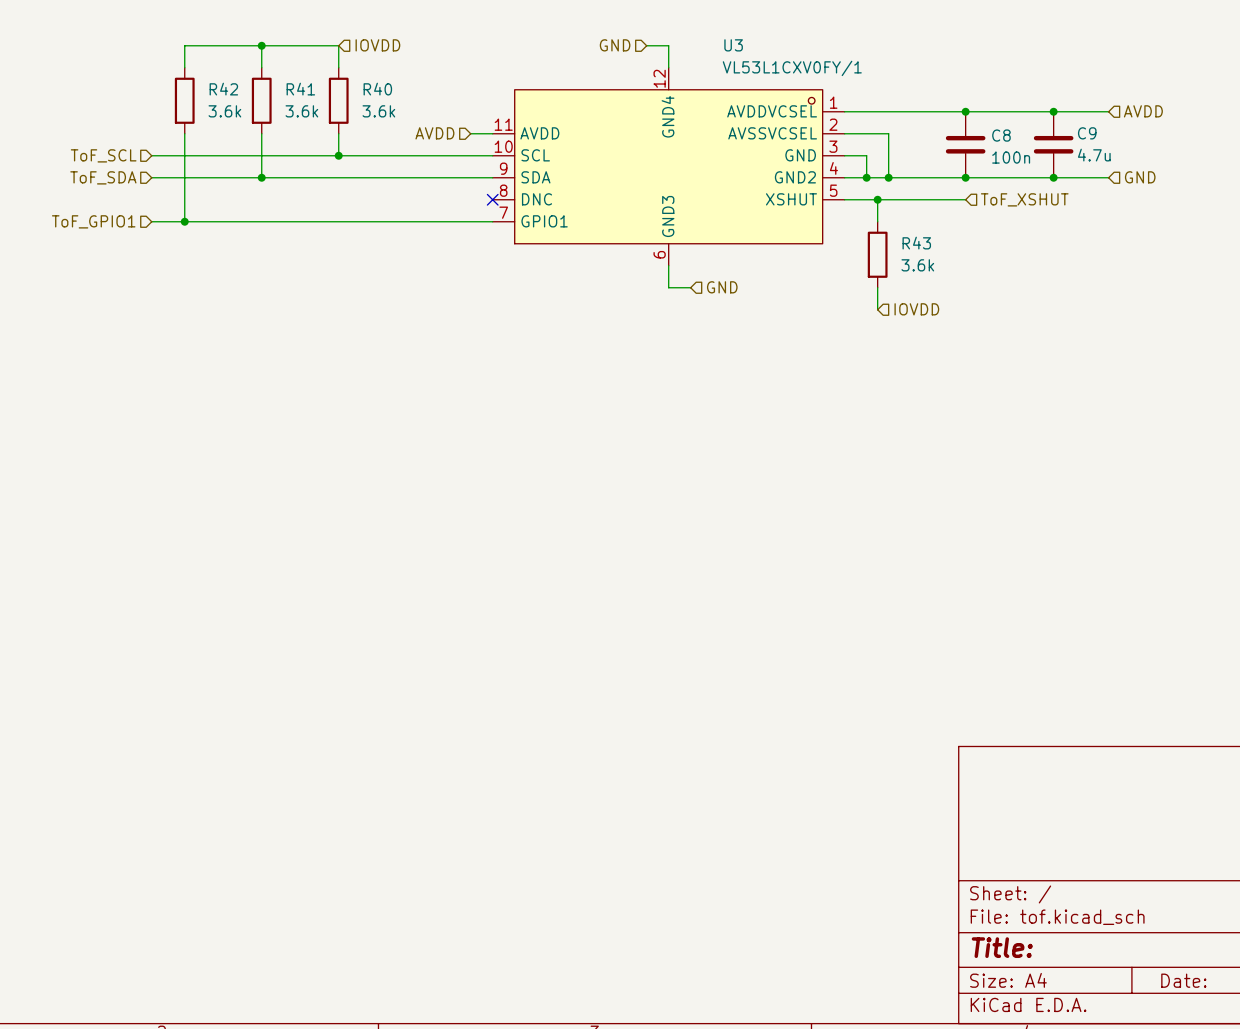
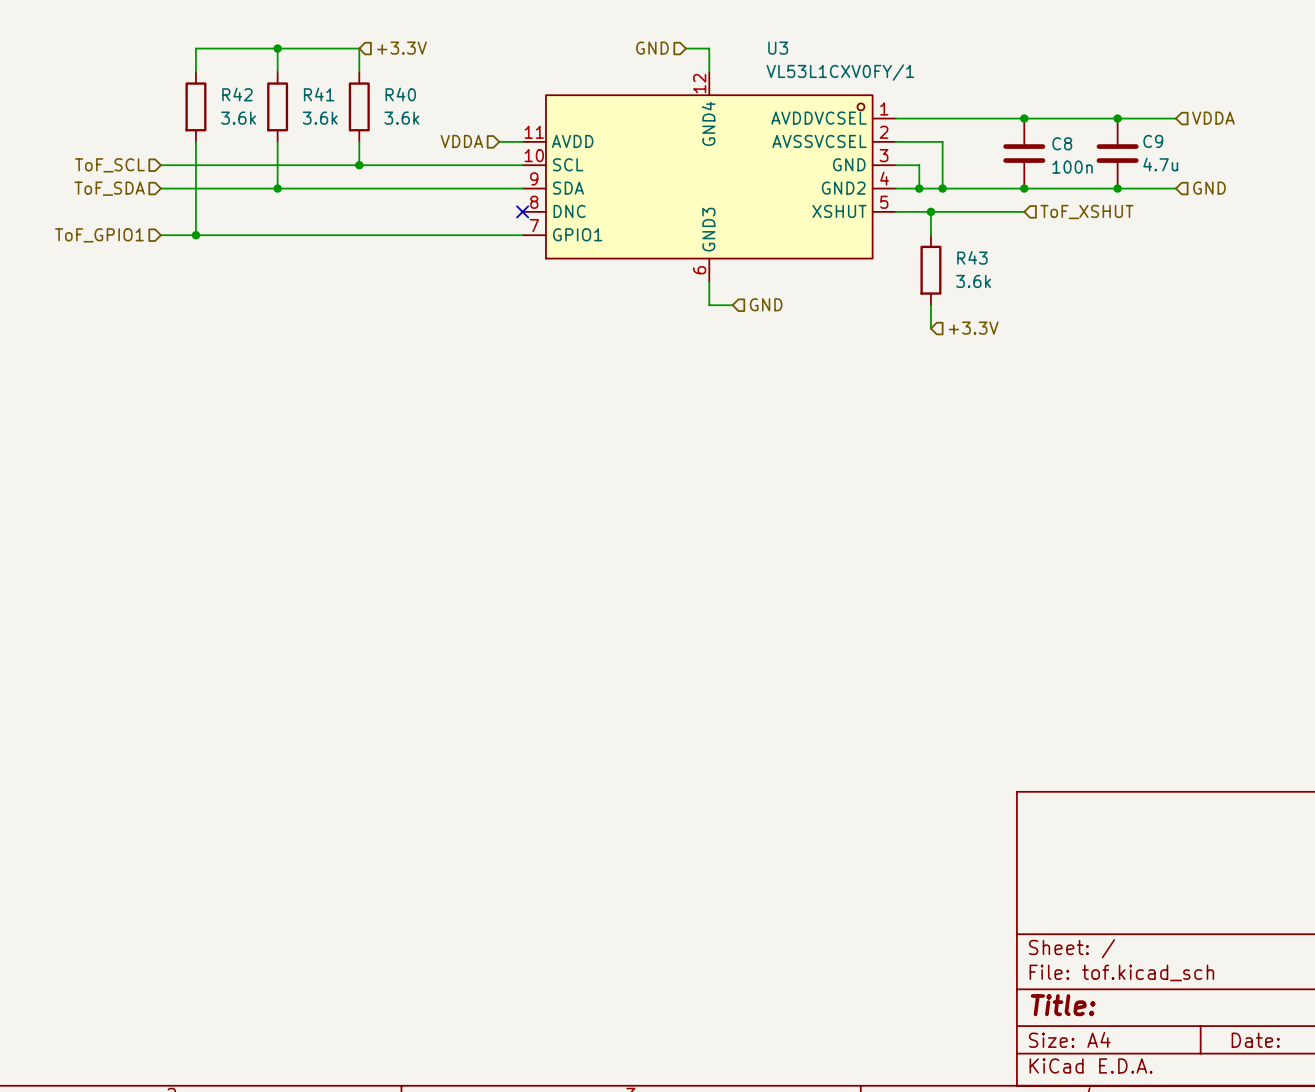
hierarchical label: IOVDD (377, 45) -> +3.3V (401, 48)
hierarchical label: AVDD (1143, 111) -> VDDA (1213, 118)
hierarchical label: AVDD (434, 133) -> VDDA (461, 141)
hierarchical label: IOVDD (916, 309) -> +3.3V (973, 328)

